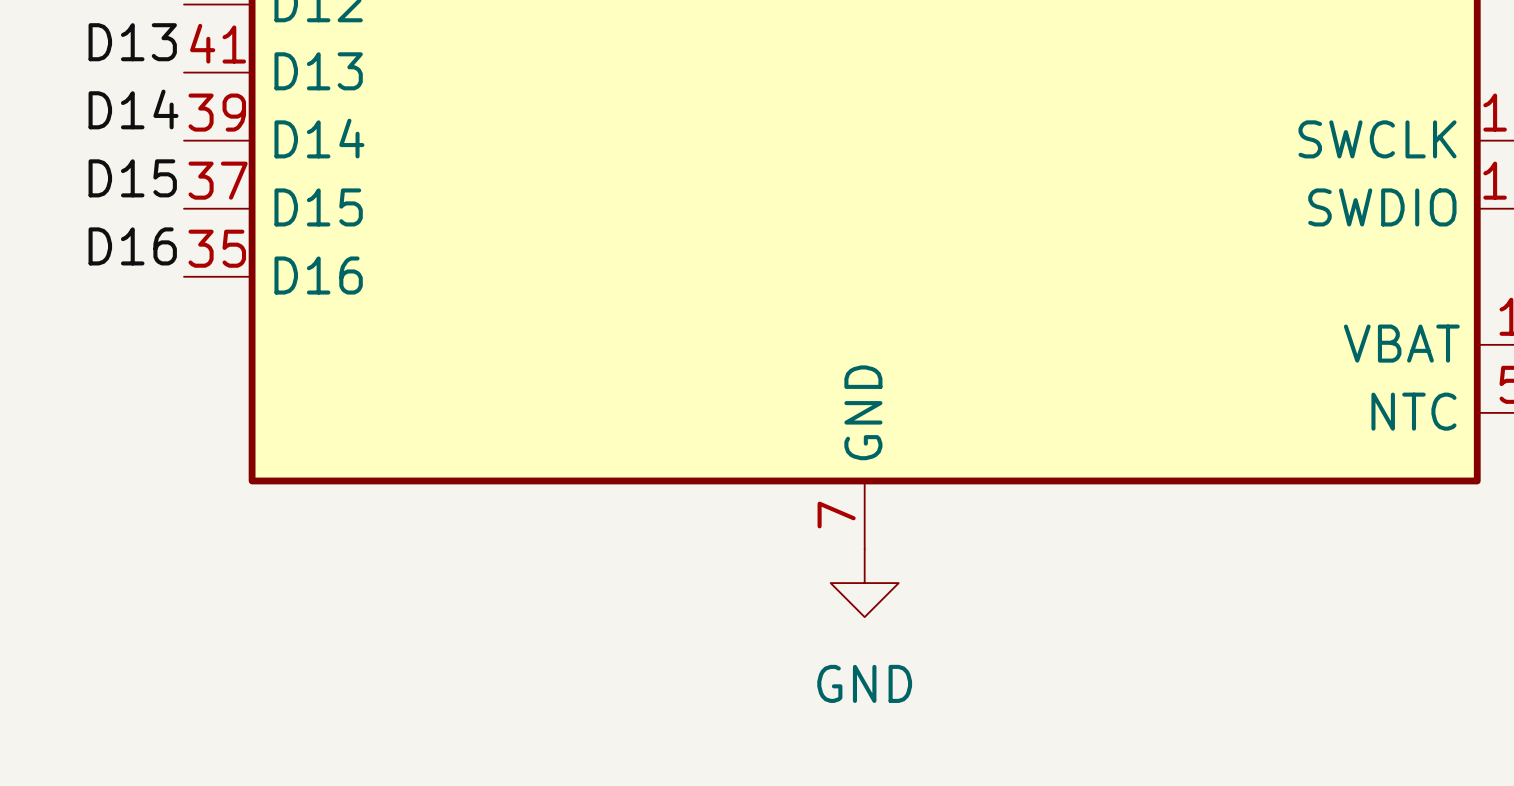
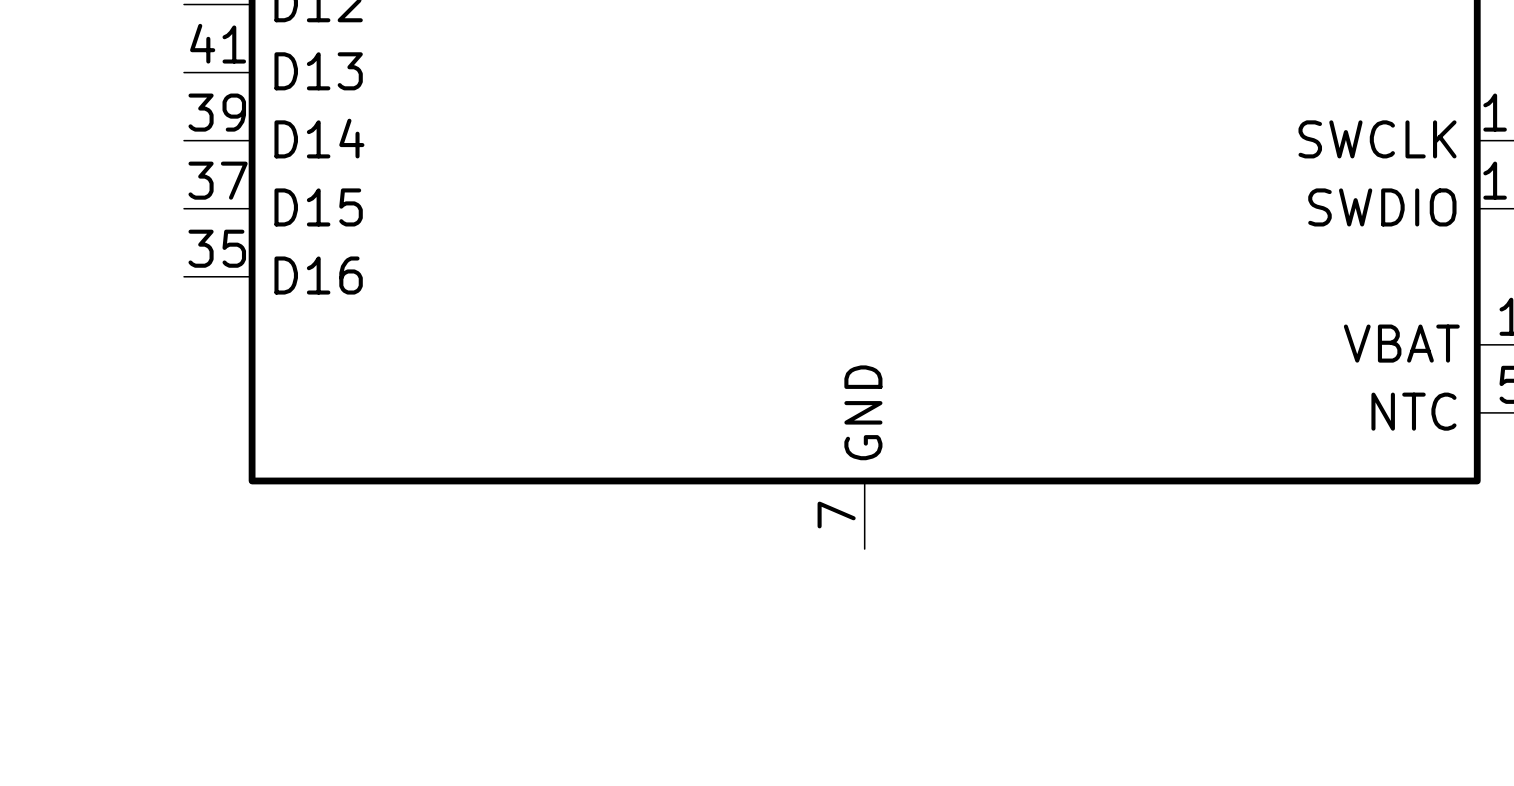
label: D13 (132, 42) -> none
label: D14 (133, 109) -> none
label: D15 (132, 178) -> none
label: D16 (132, 246) -> none
power symbol: GND (864, 583) -> none

